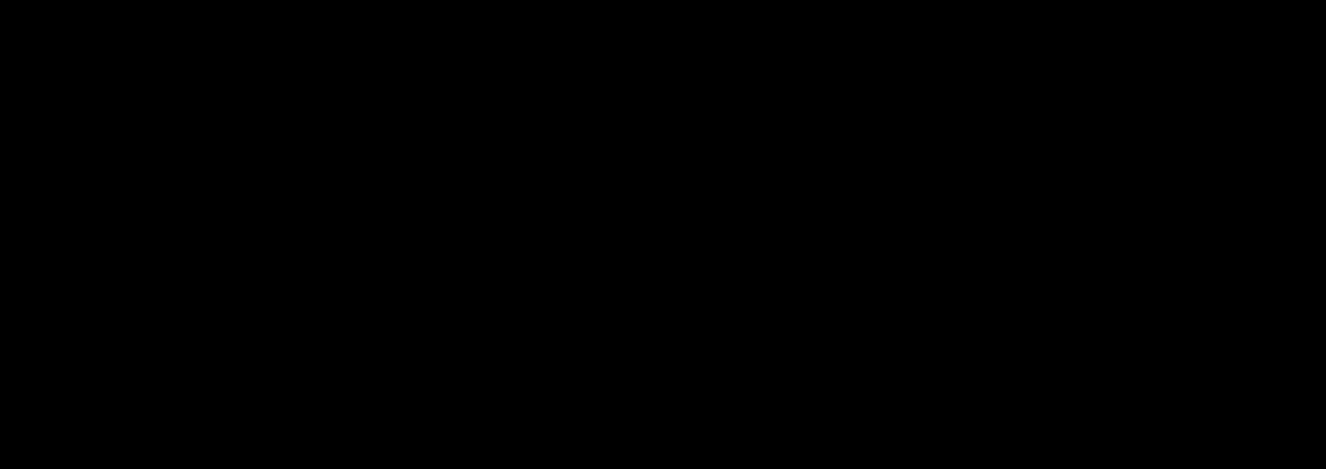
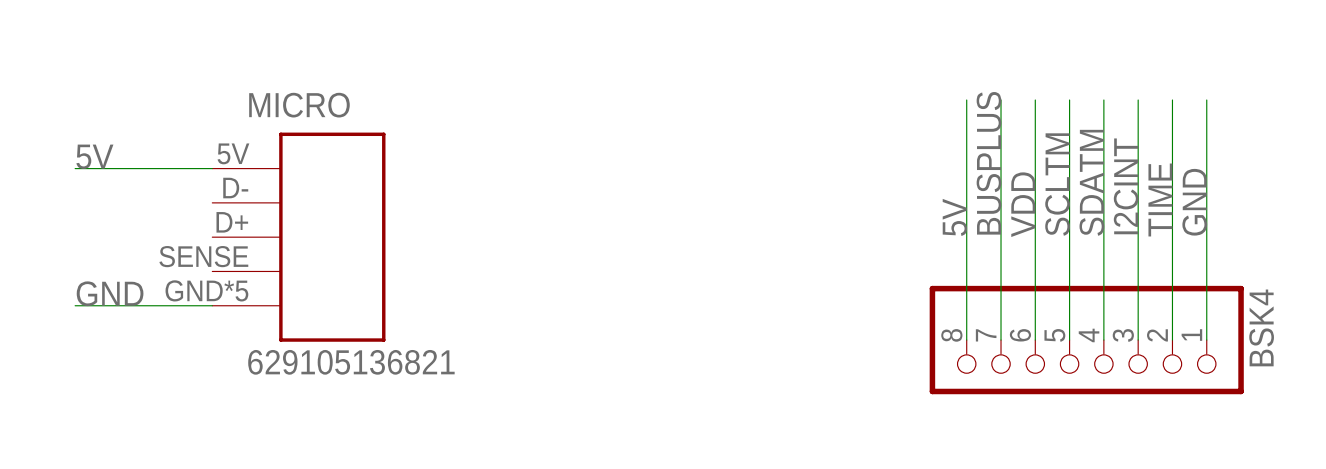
wire: none -> (966, 100) (966, 340)
wire: none -> (1001, 100) (1001, 340)
wire: none -> (1035, 100) (1035, 340)
wire: none -> (1069, 100) (1069, 340)
wire: none -> (1103, 100) (1103, 340)
wire: none -> (1138, 100) (1138, 340)
wire: none -> (1172, 100) (1172, 340)
wire: none -> (1206, 100) (1206, 340)
label: none -> 5V (94, 156)
label: none -> BUSPLUS (988, 163)
wire: none -> (75, 168) (212, 168)
label: none -> I2CINT (1126, 186)
label: none -> SDATM (1091, 182)
label: none -> SCLTM (1057, 184)
label: none -> TIME (1160, 199)
label: none -> GND (1194, 202)
label: none -> VDD (1023, 204)
label: none -> 5V (954, 217)
MICRO: none -> 629105136821 (298, 237)
label: none -> GND (110, 293)
wire: none -> (75, 305) (212, 305)
BSK4: none -> (1086, 340)

